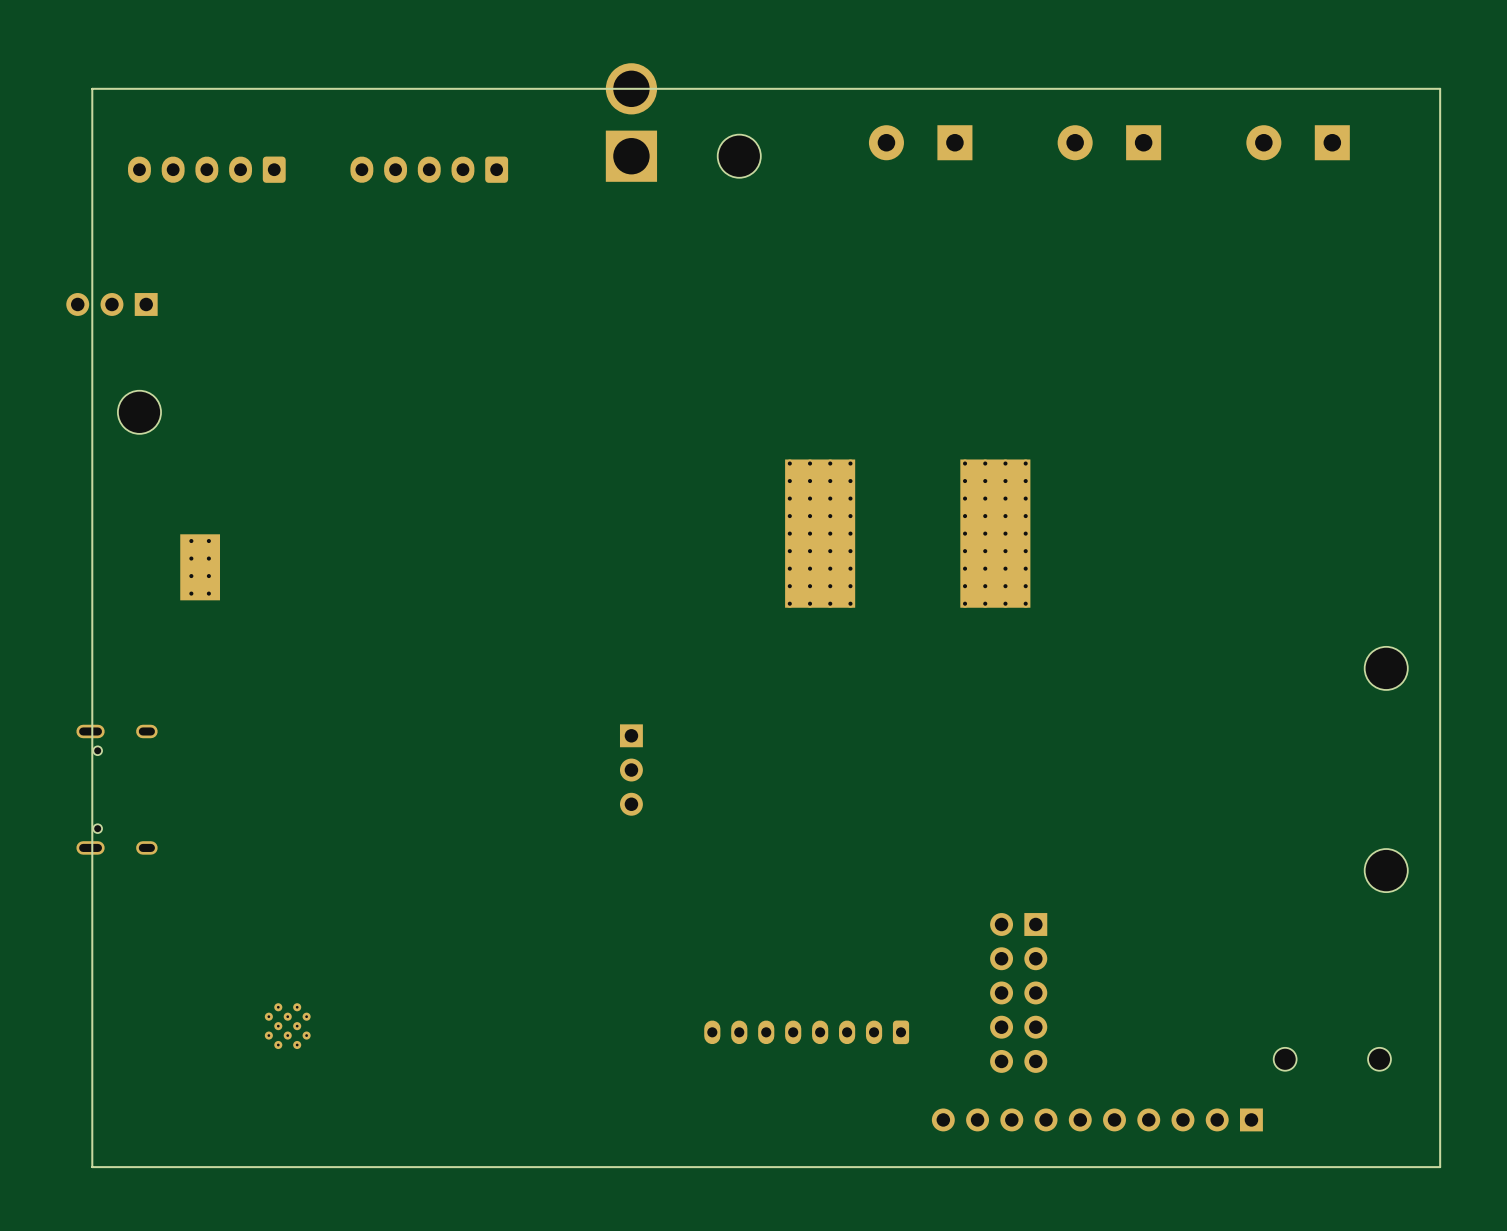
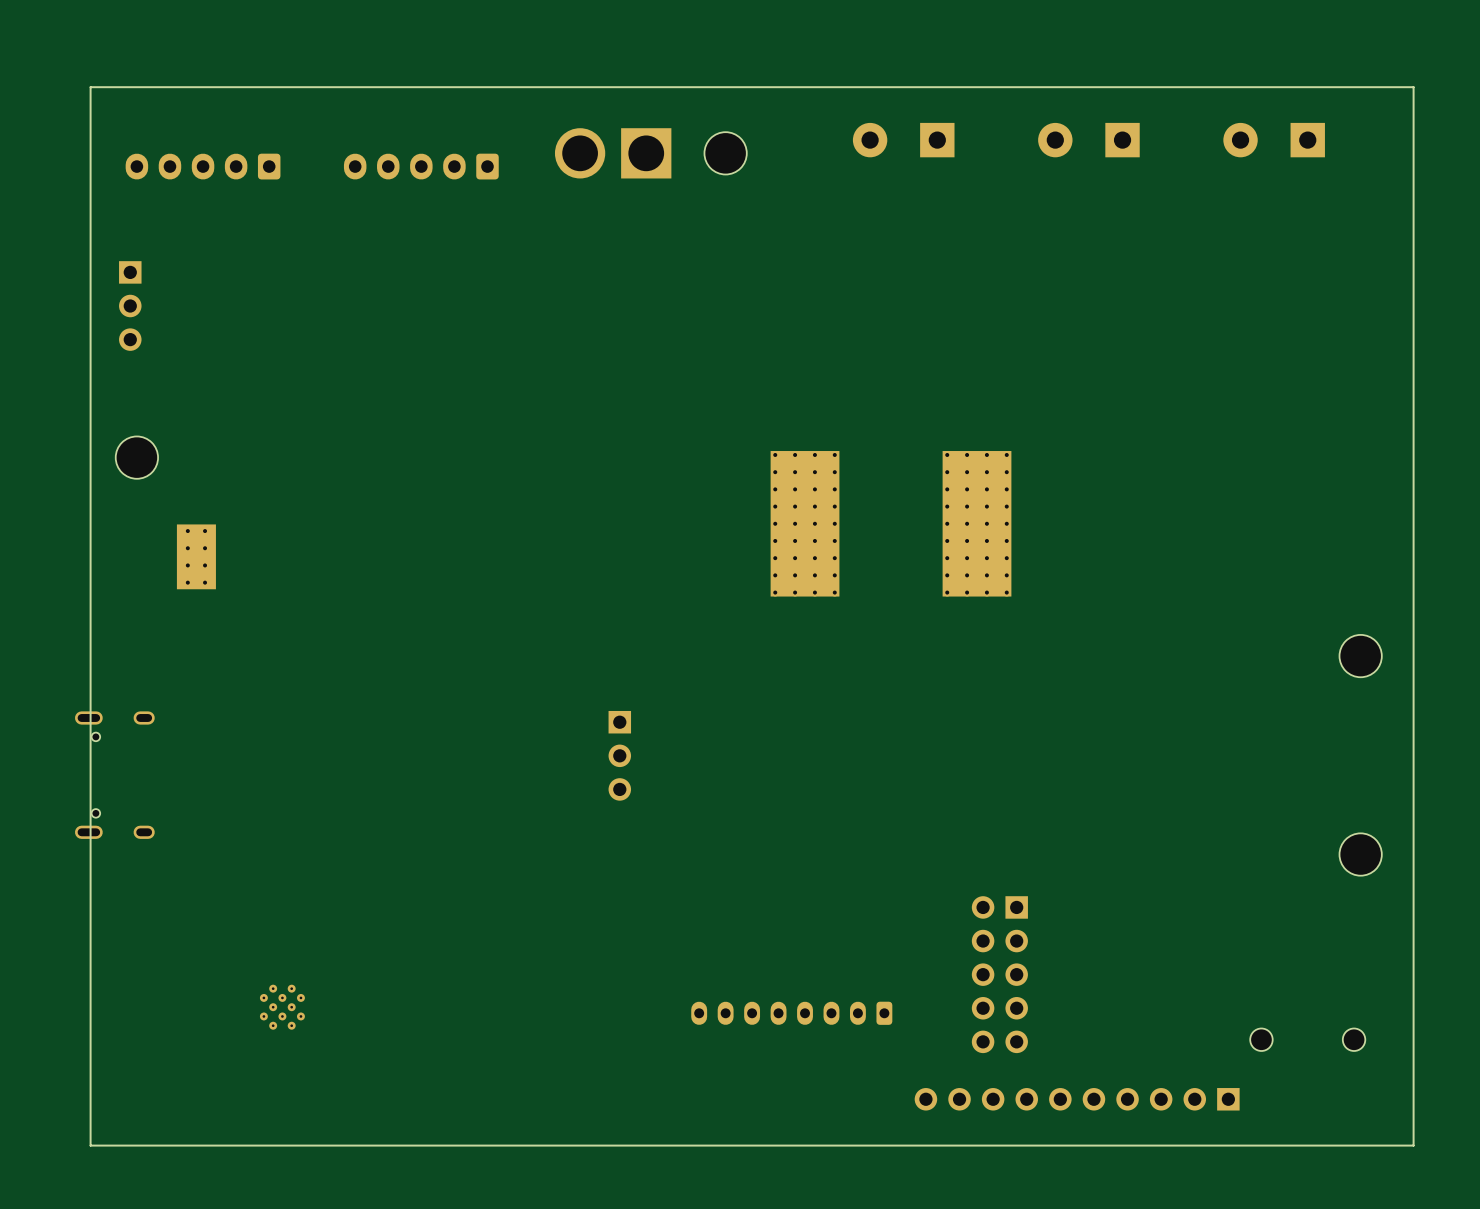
part rotation: 0° (631, 122) -> 90° counterclockwise (613, 153)
part rotation: 0° (111, 304) -> 90° counterclockwise (130, 306)
part position: (139, 412) -> (136, 457)

